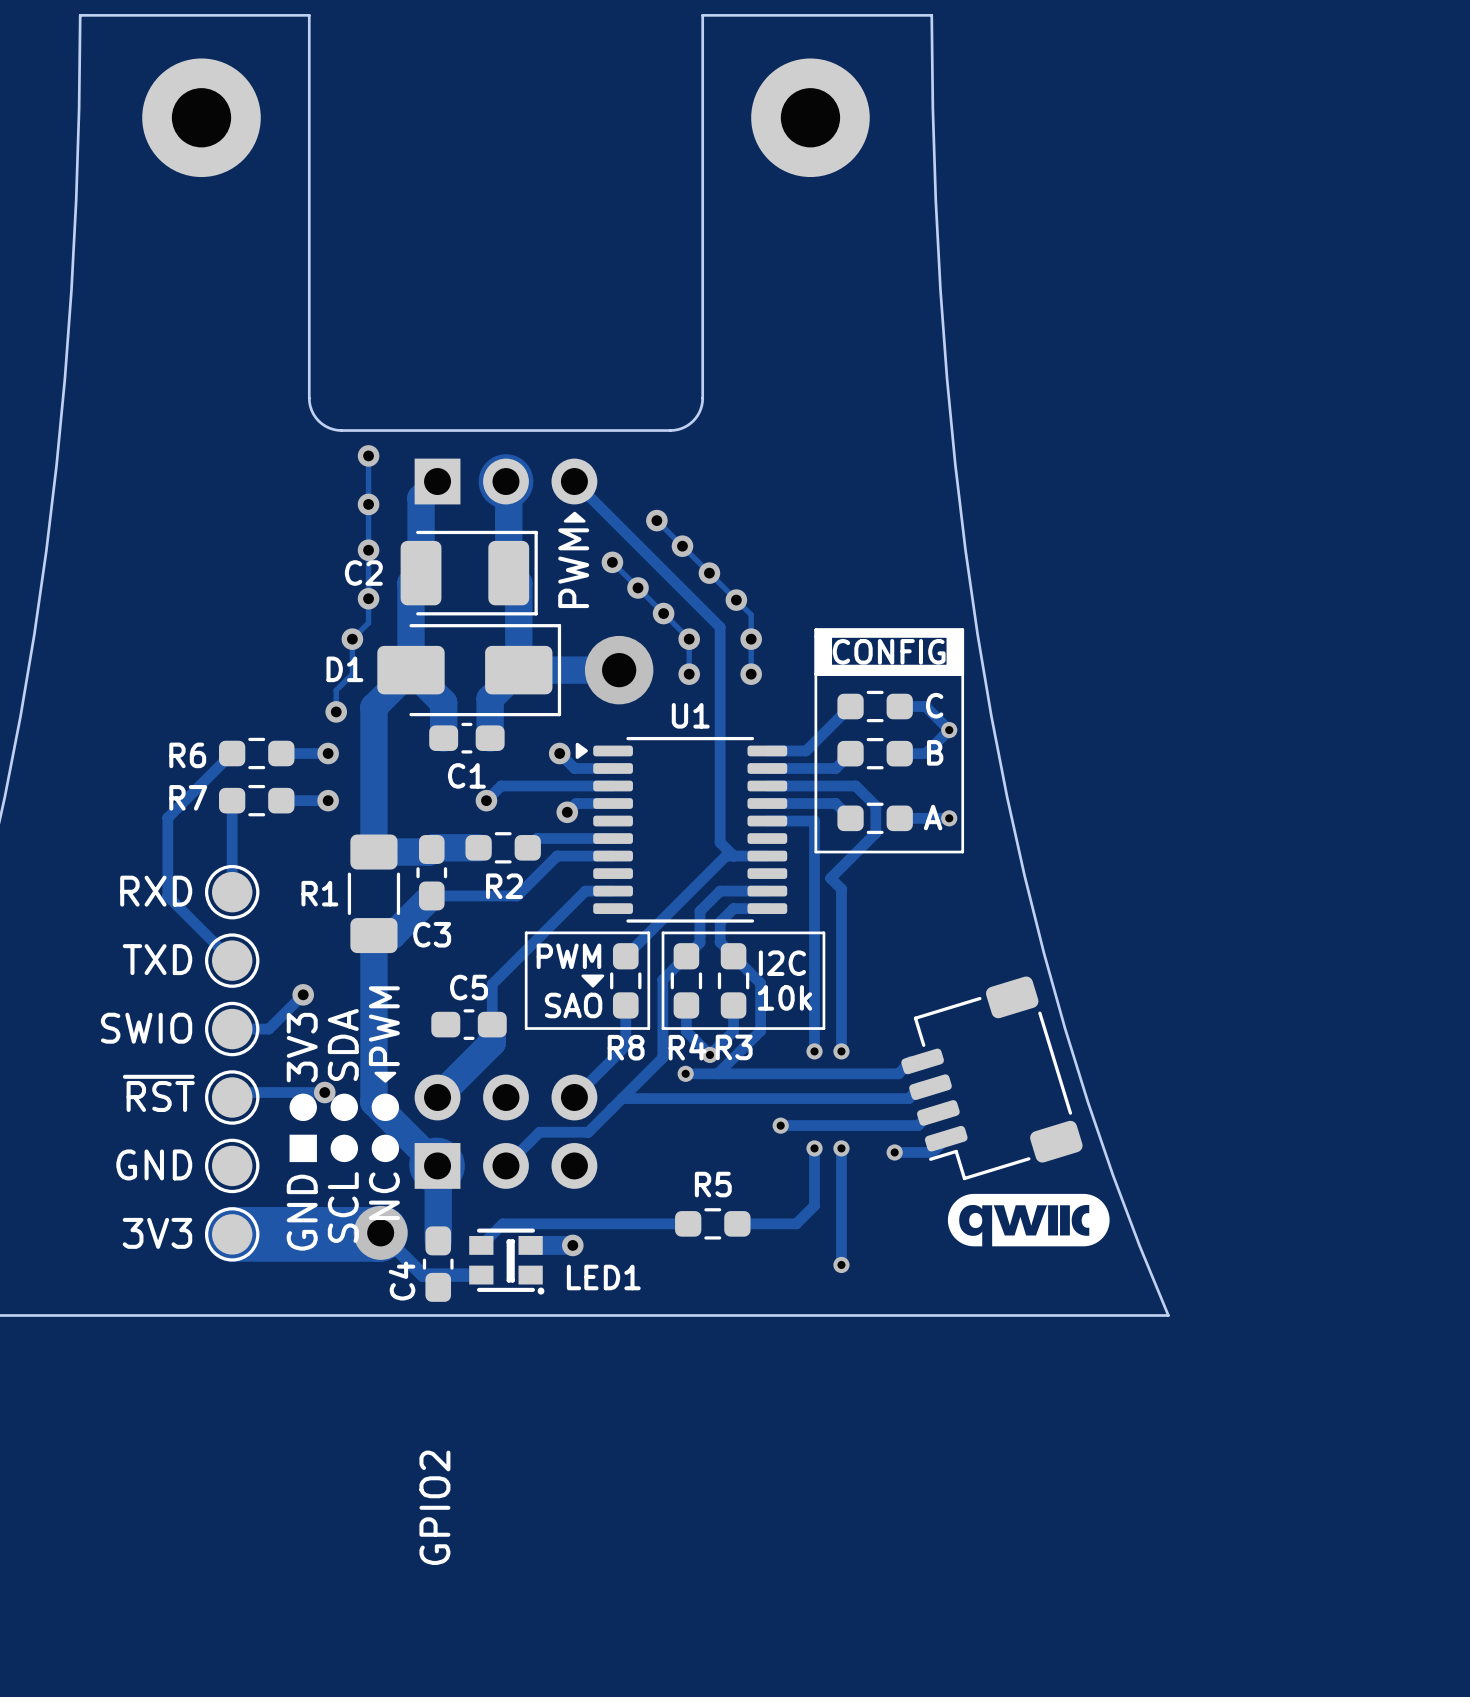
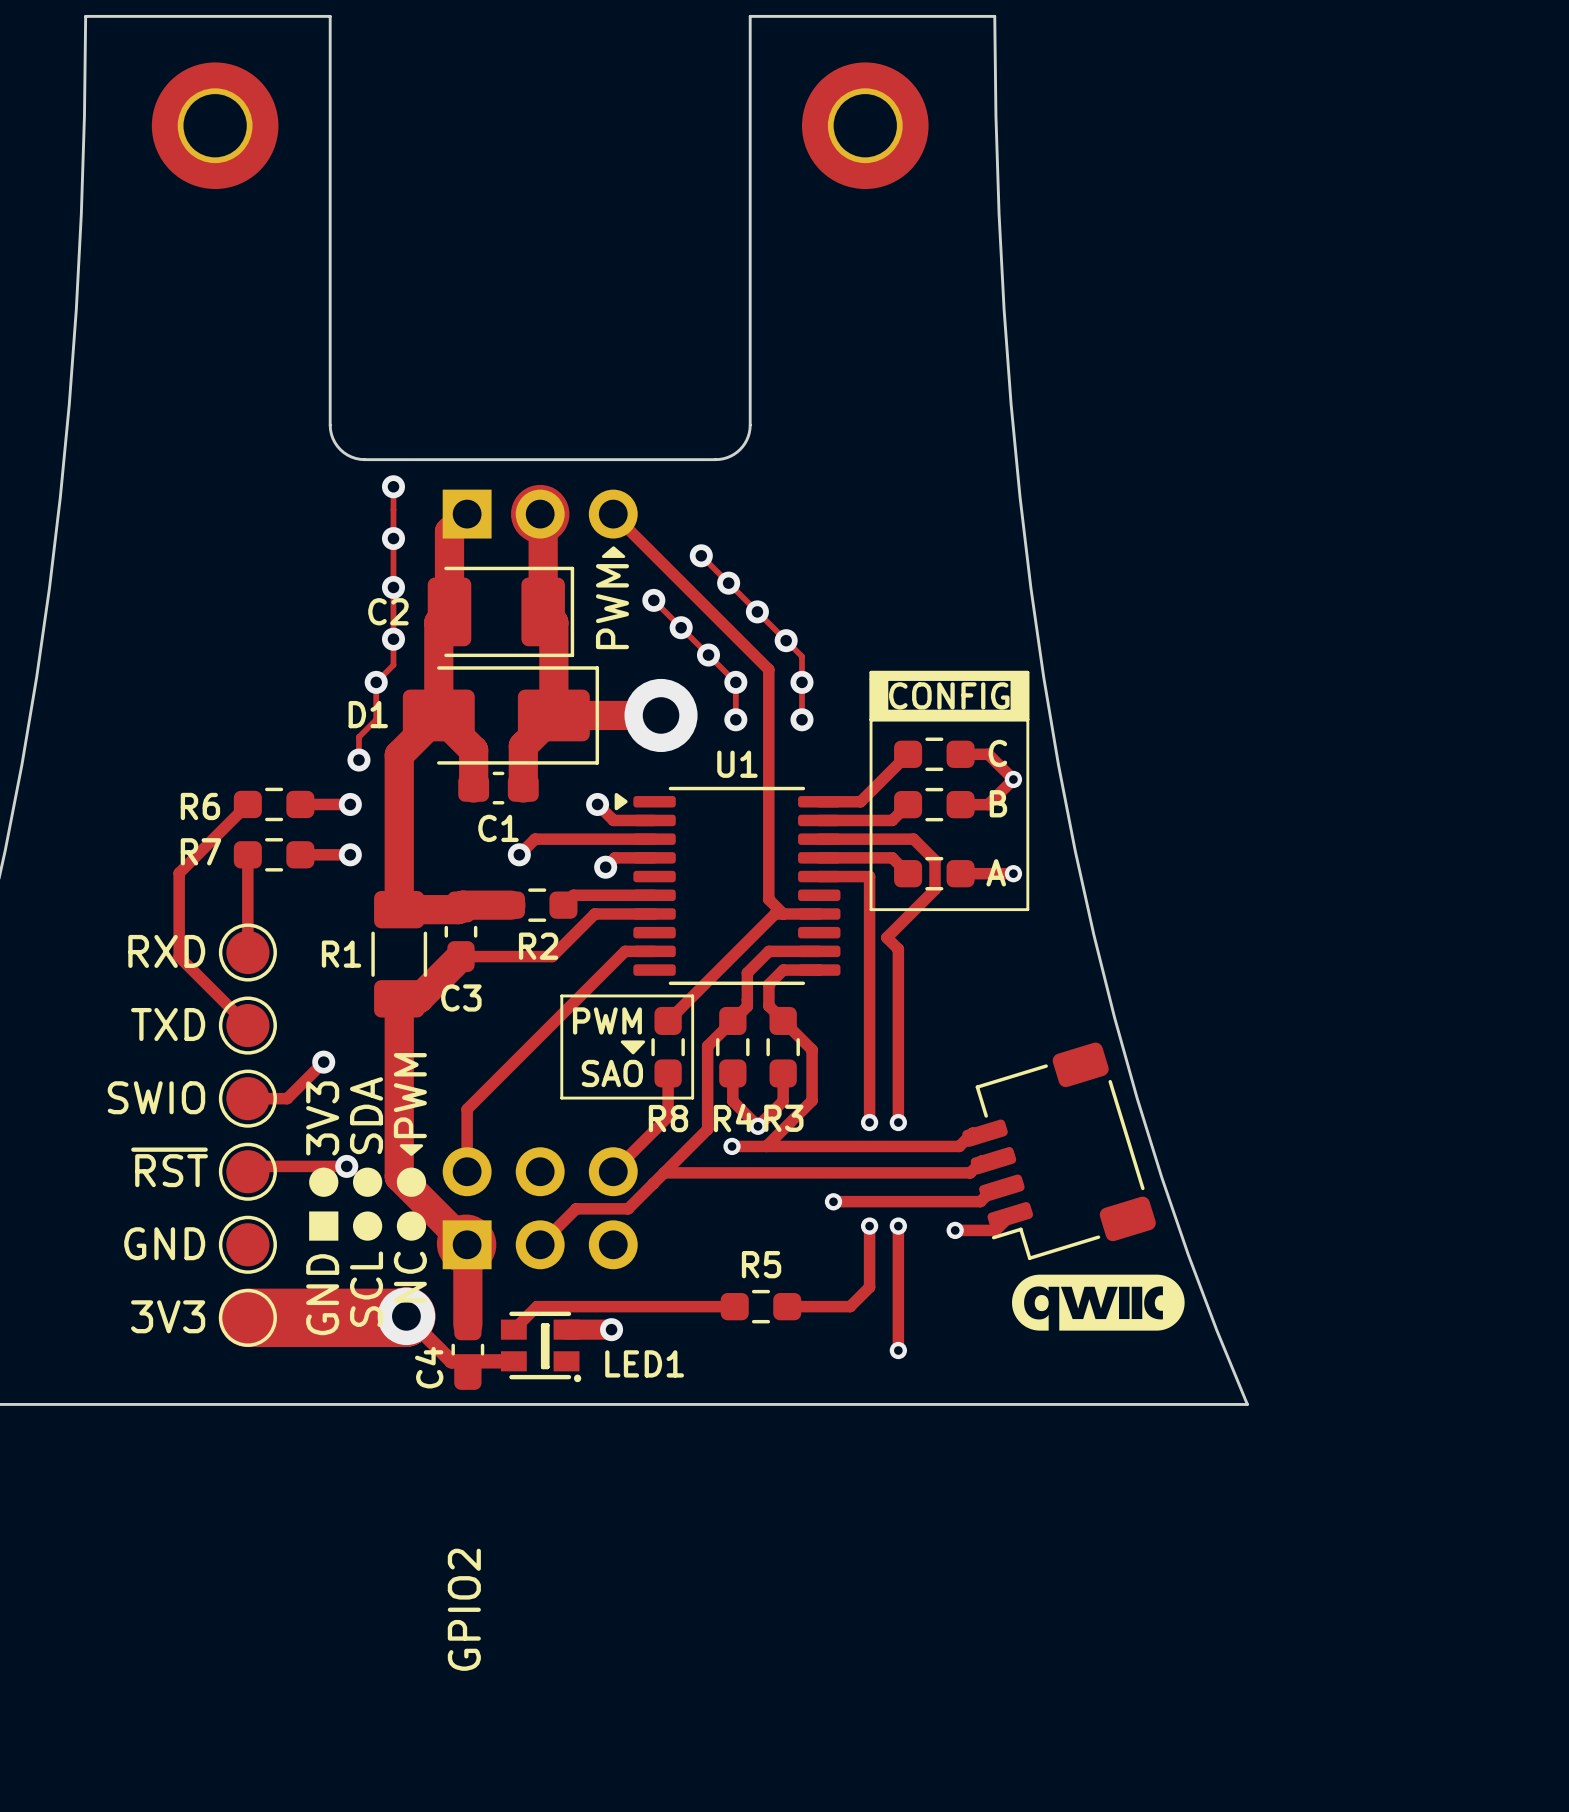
line: (663, 932) (823, 932) (823, 1028) (663, 1028) (663, 932) -> none
text: I2C (782, 963) -> none
track: (492, 984) (492, 1042) (437, 1097) -> (525, 1050) (467, 1109) (467, 1171)
text: 10k (784, 997) -> none
C5: (469, 1024) -> none

